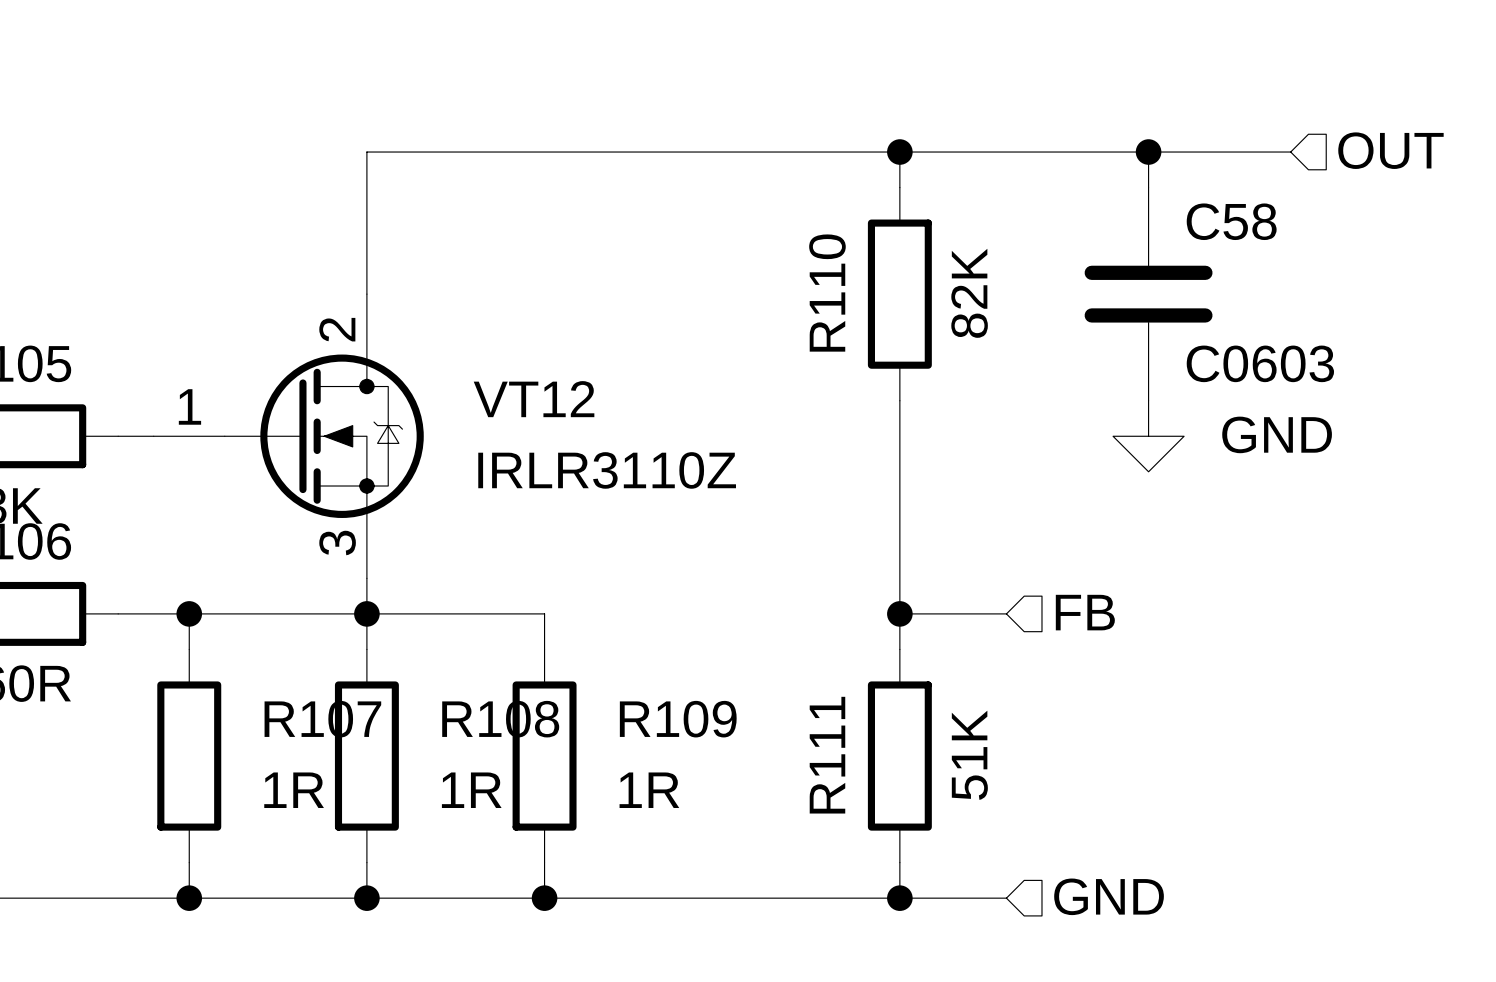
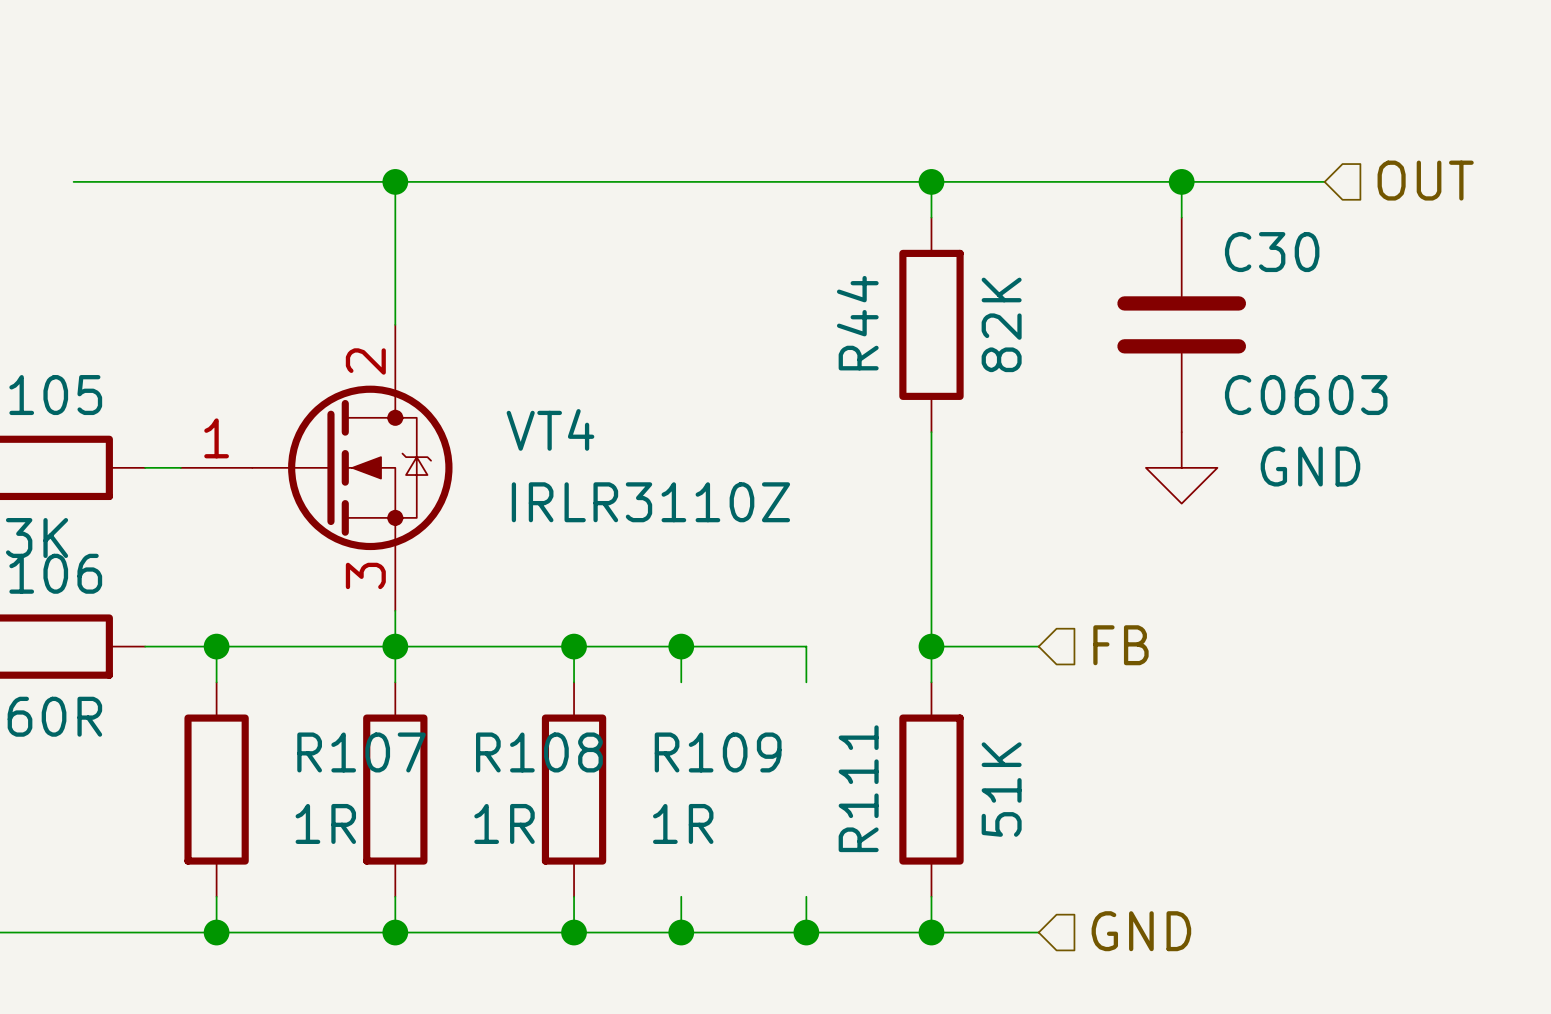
wire: none -> (73, 181) (395, 181)
junction: none -> (395, 181)
C58 name: C58 (1231, 221) -> C30 (1272, 252)
R110 name: R110 (827, 293) -> R44 (857, 323)
VT12 name: VT12 (534, 399) -> VT4 (550, 429)
wire: none -> (574, 646) (806, 646) (806, 682)
junction: none -> (574, 646)
wire: none -> (681, 646) (681, 682)
junction: none -> (681, 646)
wire: none -> (681, 896) (681, 932)
wire: none -> (806, 896) (806, 932)
junction: none -> (681, 932)
junction: none -> (806, 932)

